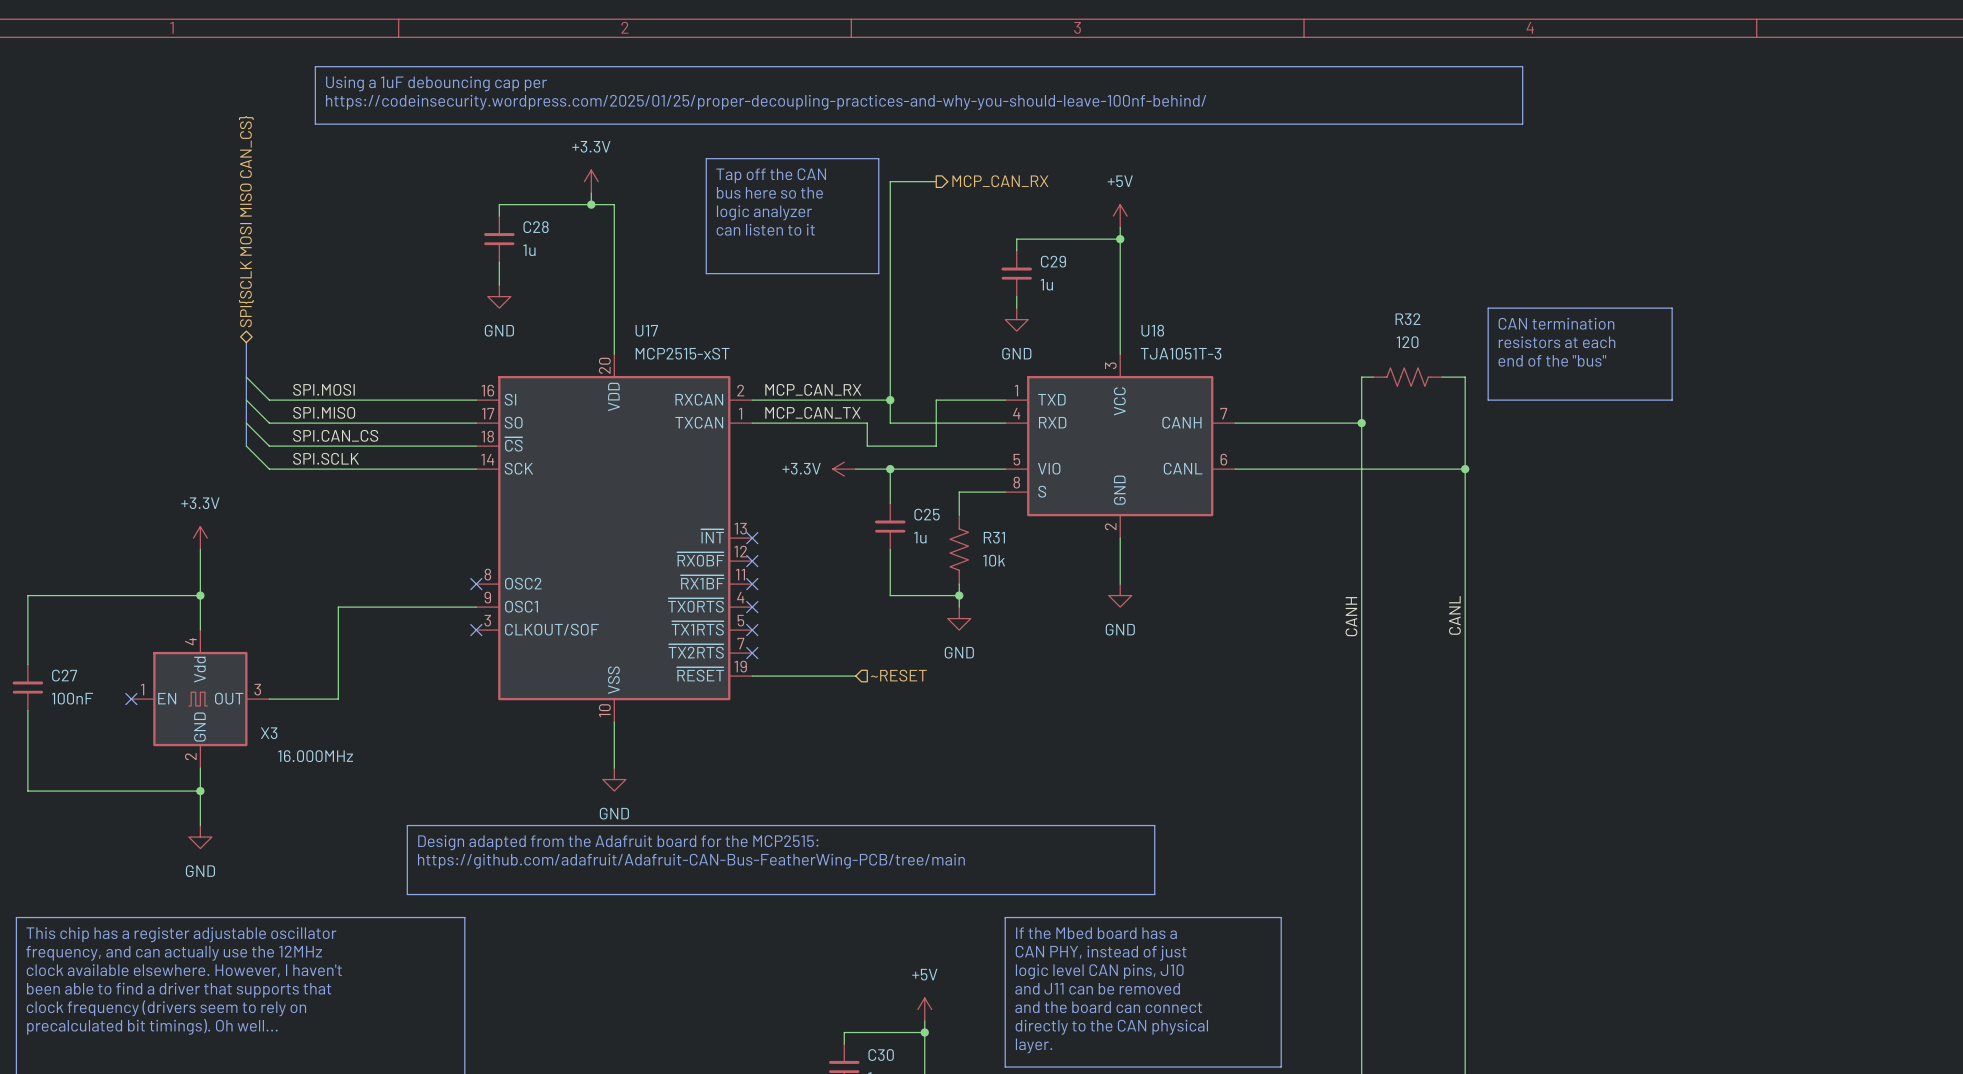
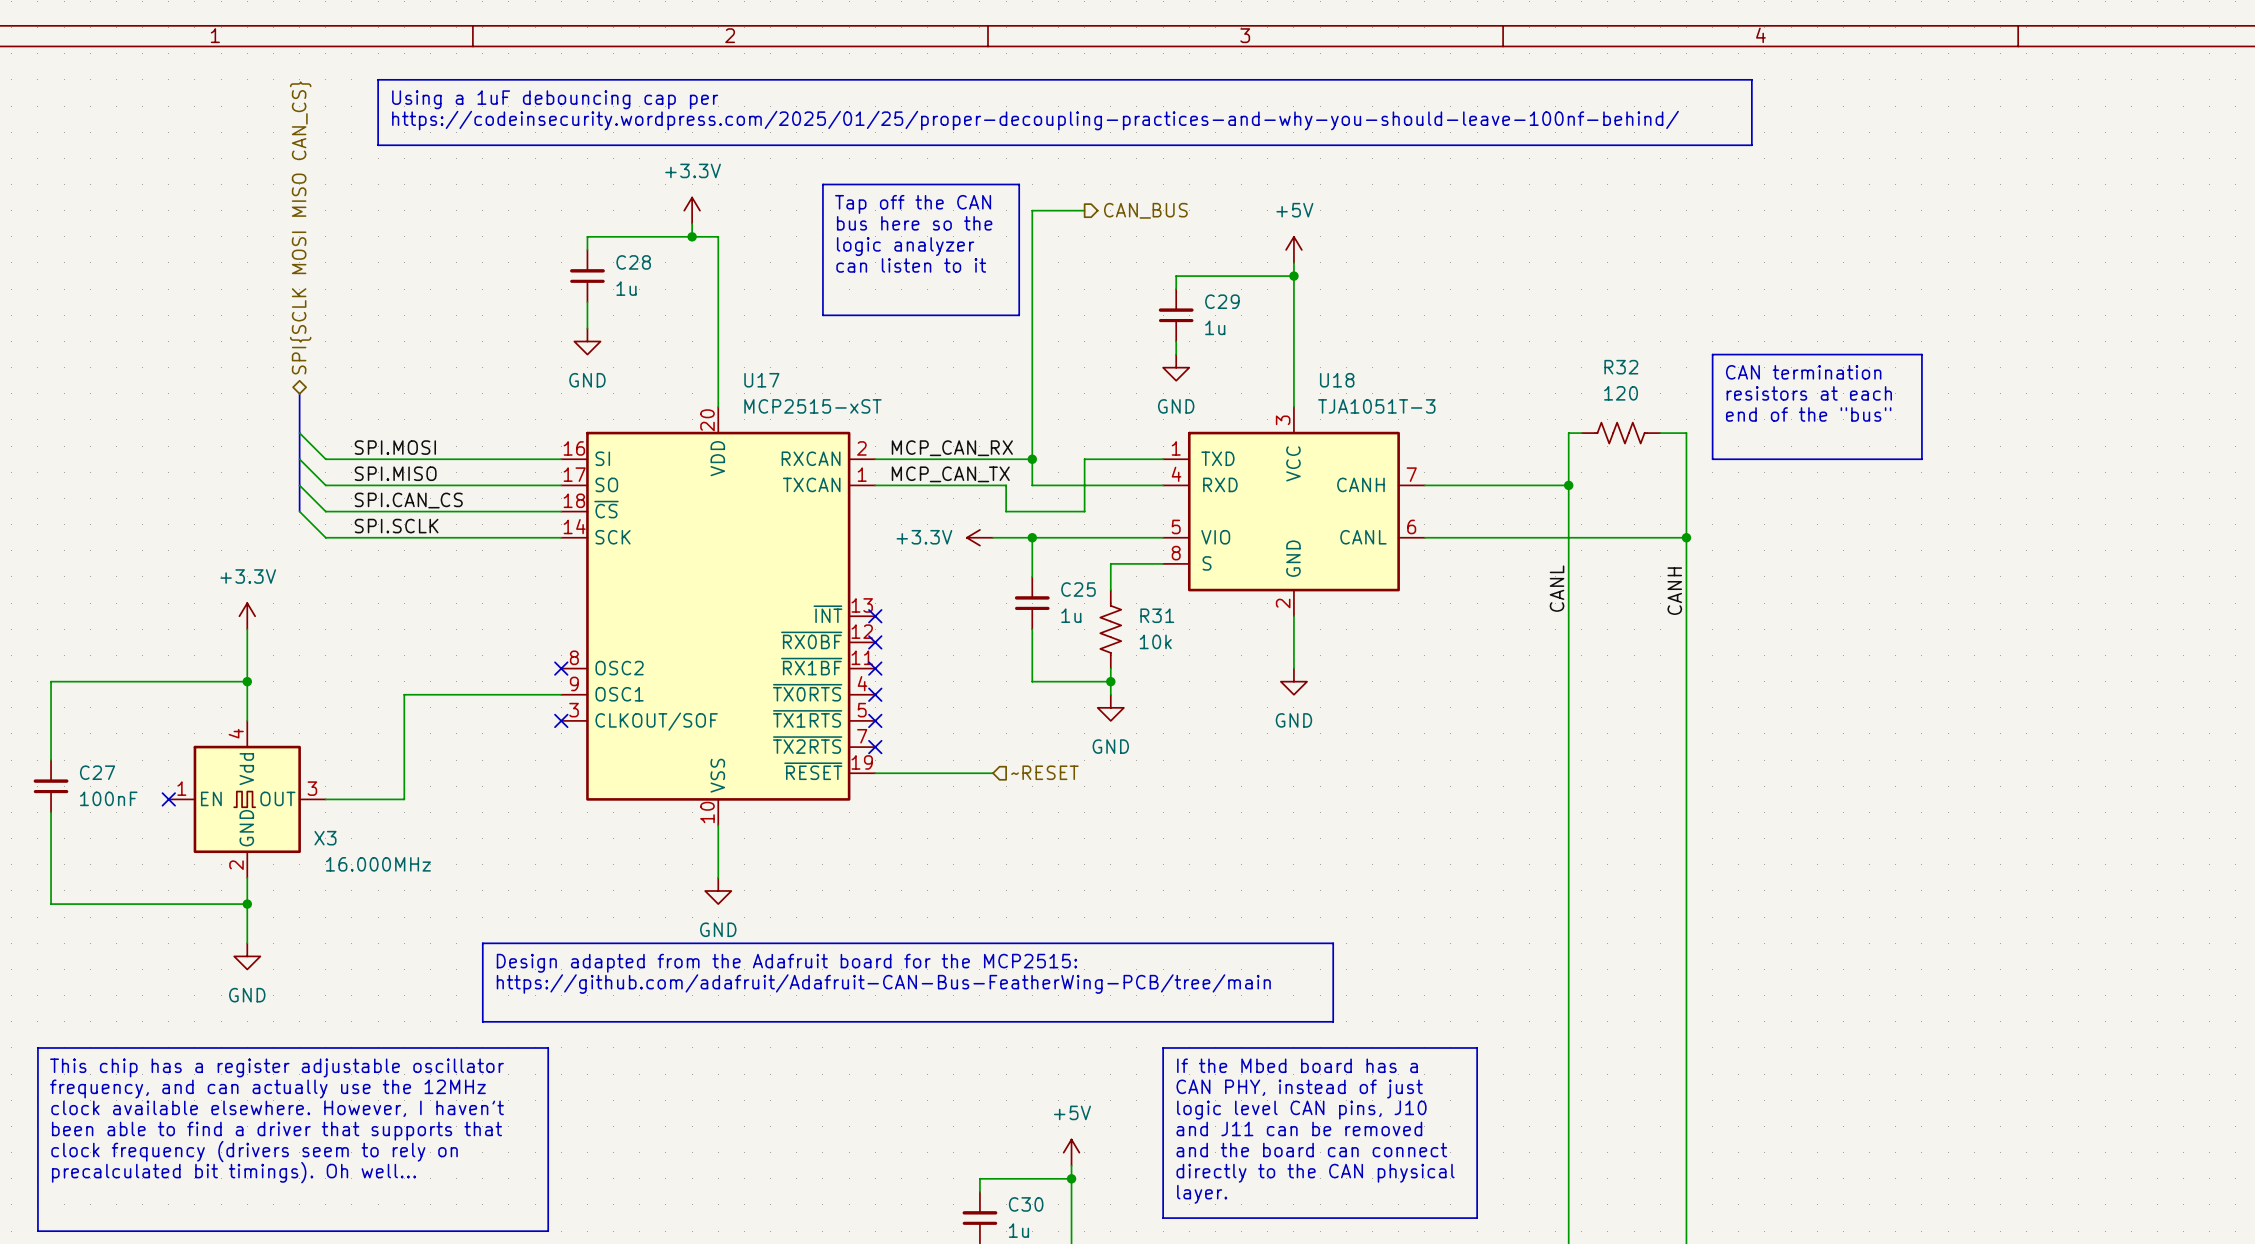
hierarchical label: MCP_CAN_RX (1000, 181) -> CAN_BUS (1145, 210)
label position: CANL (1454, 615) -> CANL (1557, 588)
label position: CANH (1351, 616) -> CANH (1674, 591)

